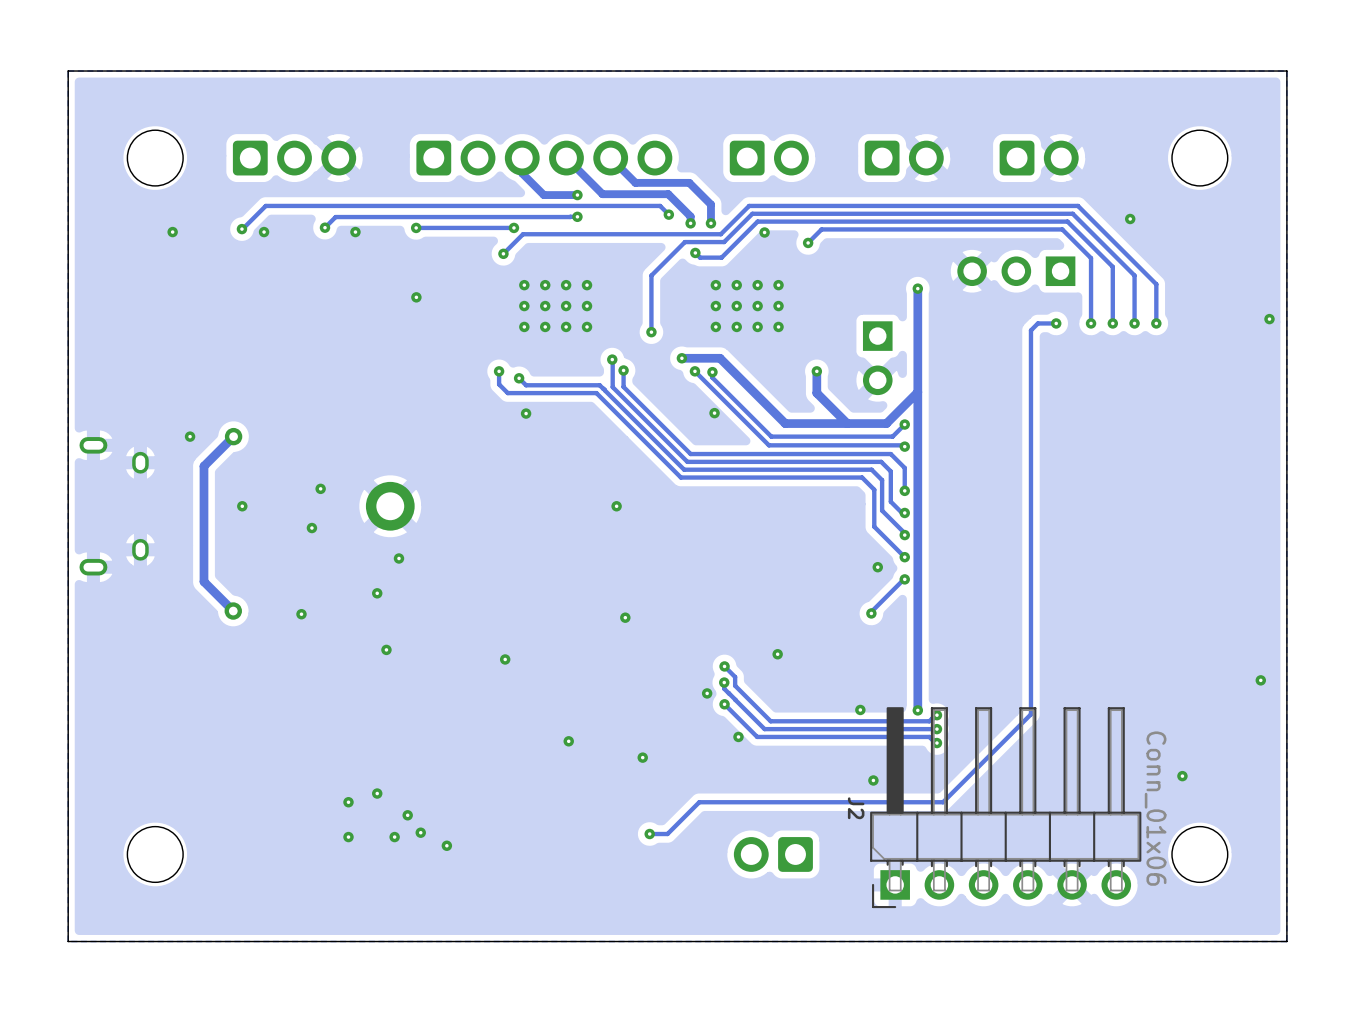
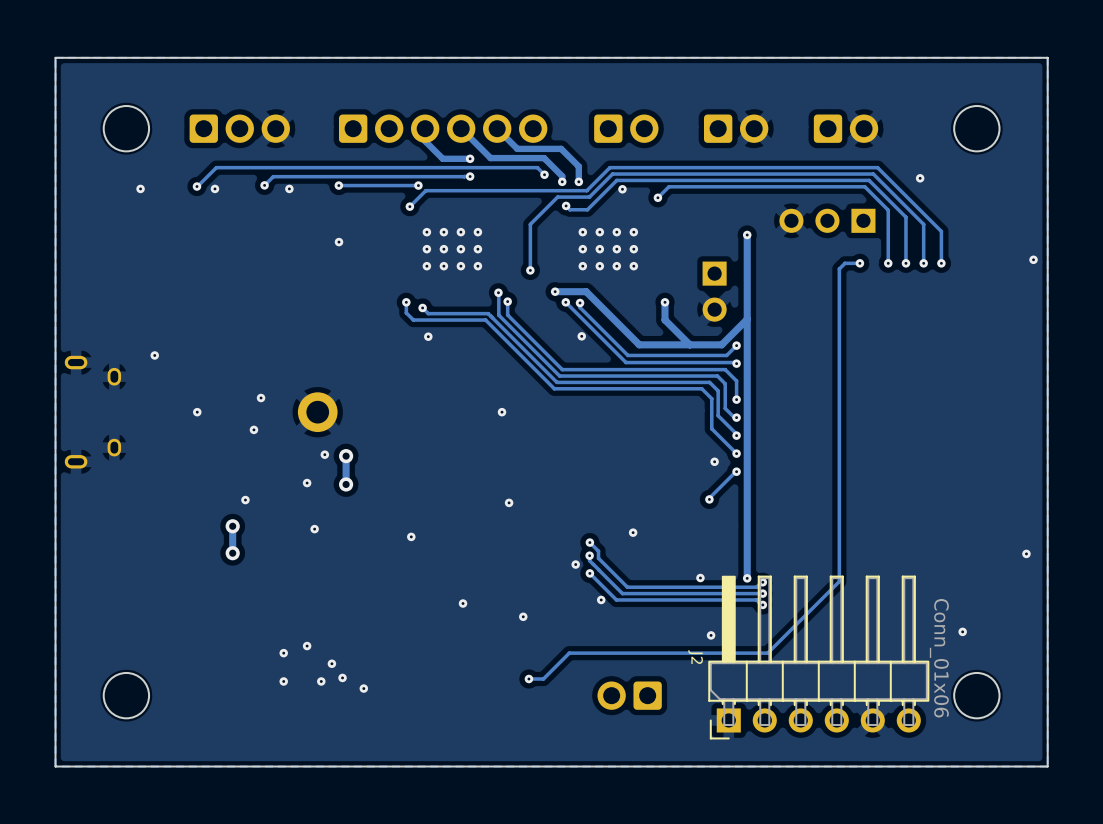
track: (233, 436) (203, 466) (203, 581) (233, 611) -> none
via: (233, 436) -> none
track: none -> (346, 456) (346, 484)
via: none -> (346, 456)
via: none -> (346, 484)
via: (233, 611) -> none
track: none -> (232, 526) (232, 553)
via: none -> (232, 526)
via: none -> (232, 553)

